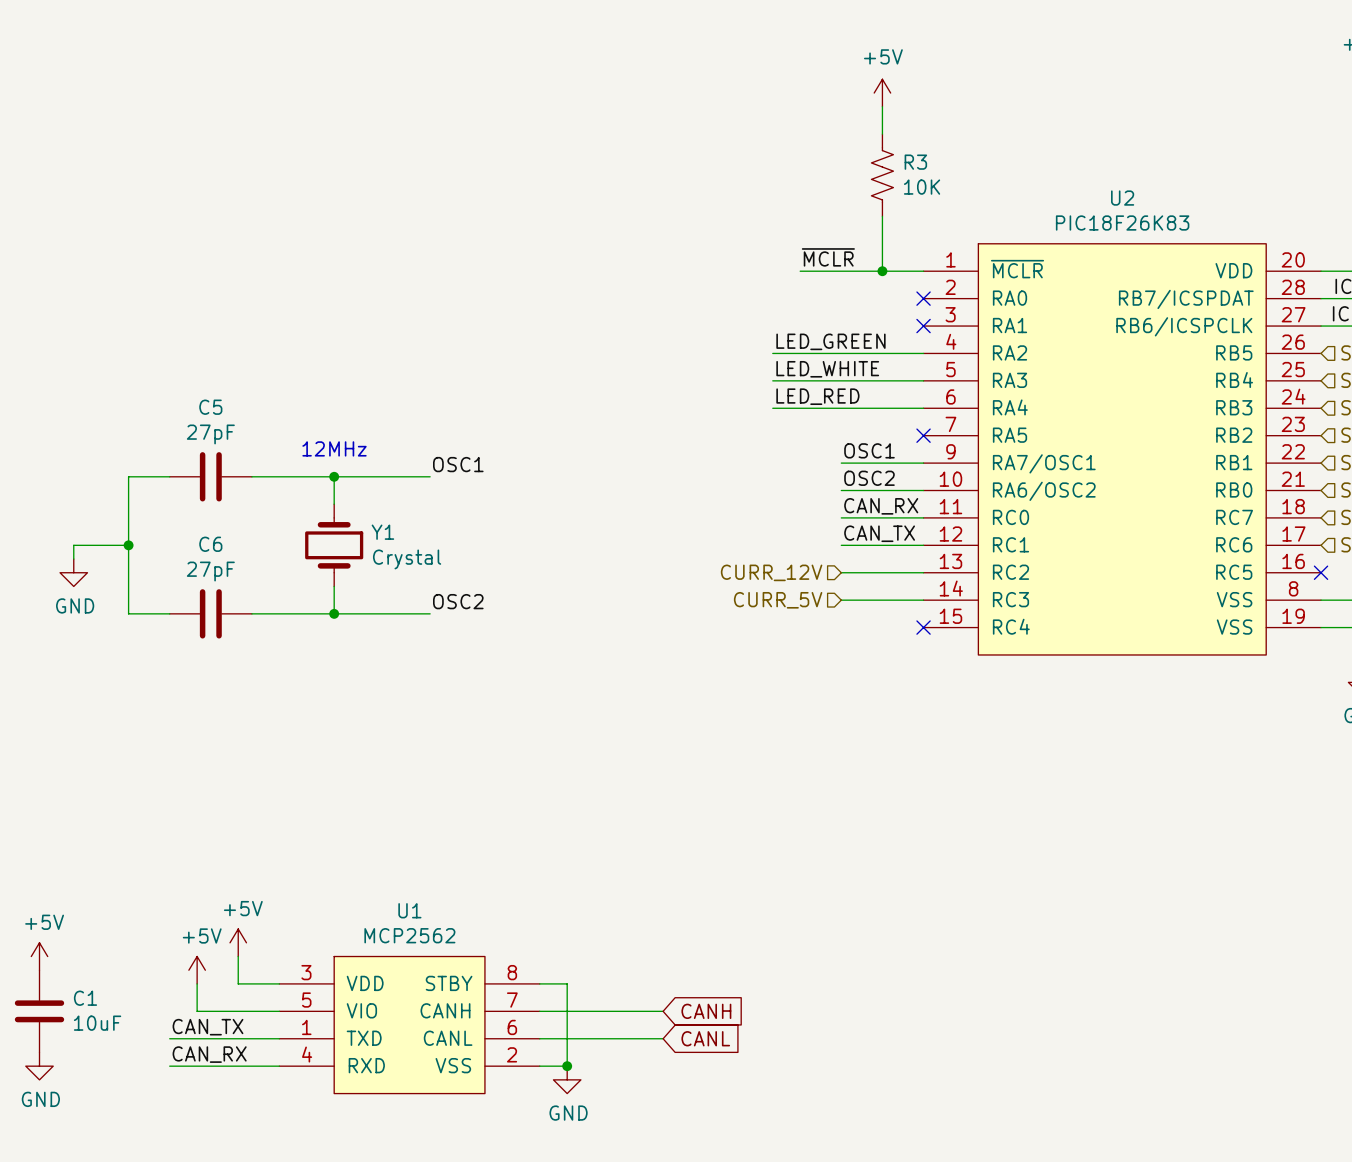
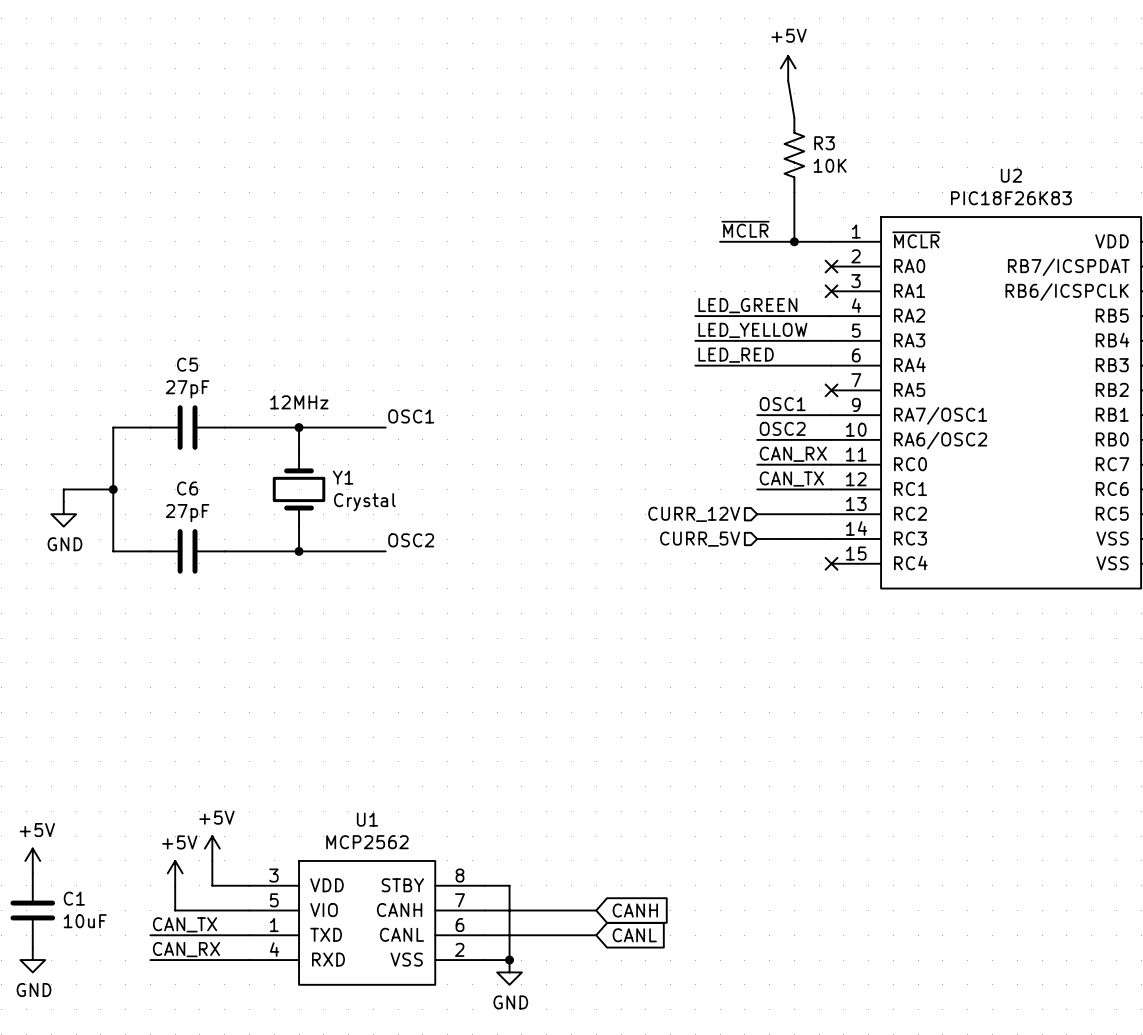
power symbol position: +5V (882, 93) -> +5V (788, 68)
wire: (882, 106) (882, 134) -> (788, 80) (794, 117)
label: LED_WHITE (827, 369) -> LED_YELLOW (752, 330)

